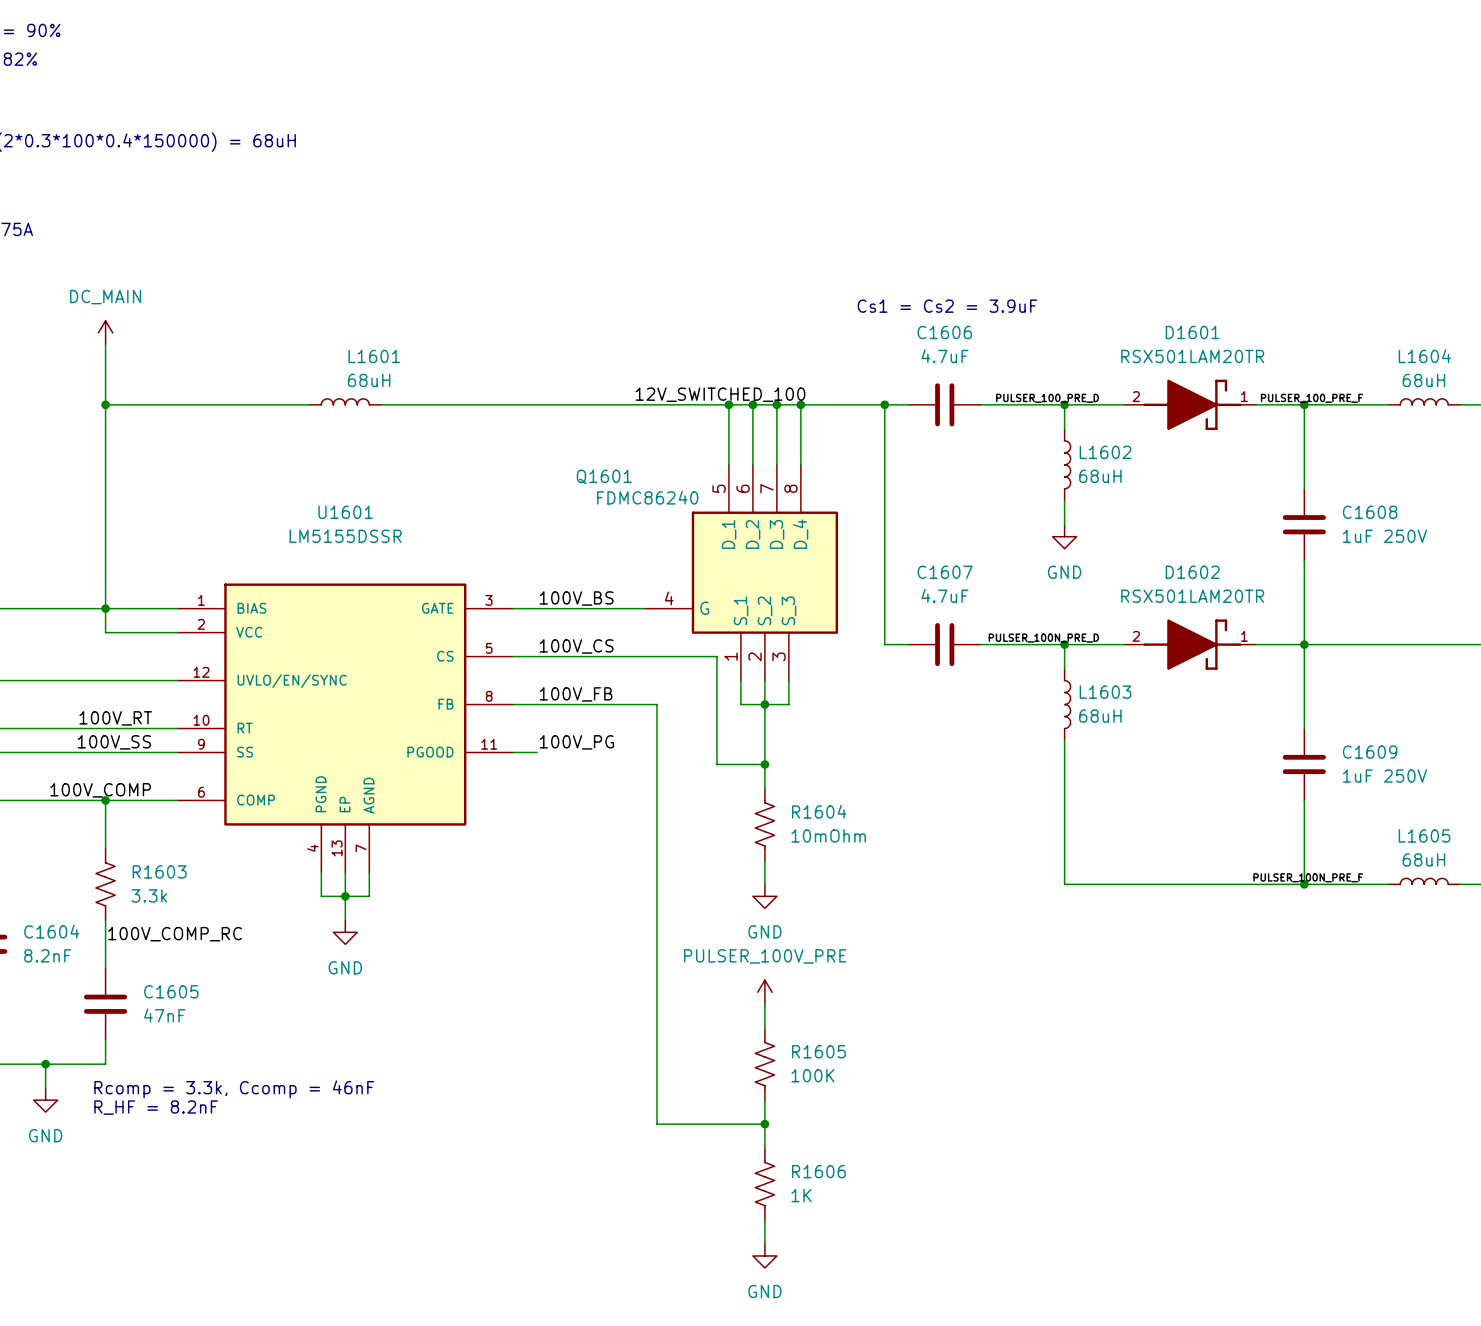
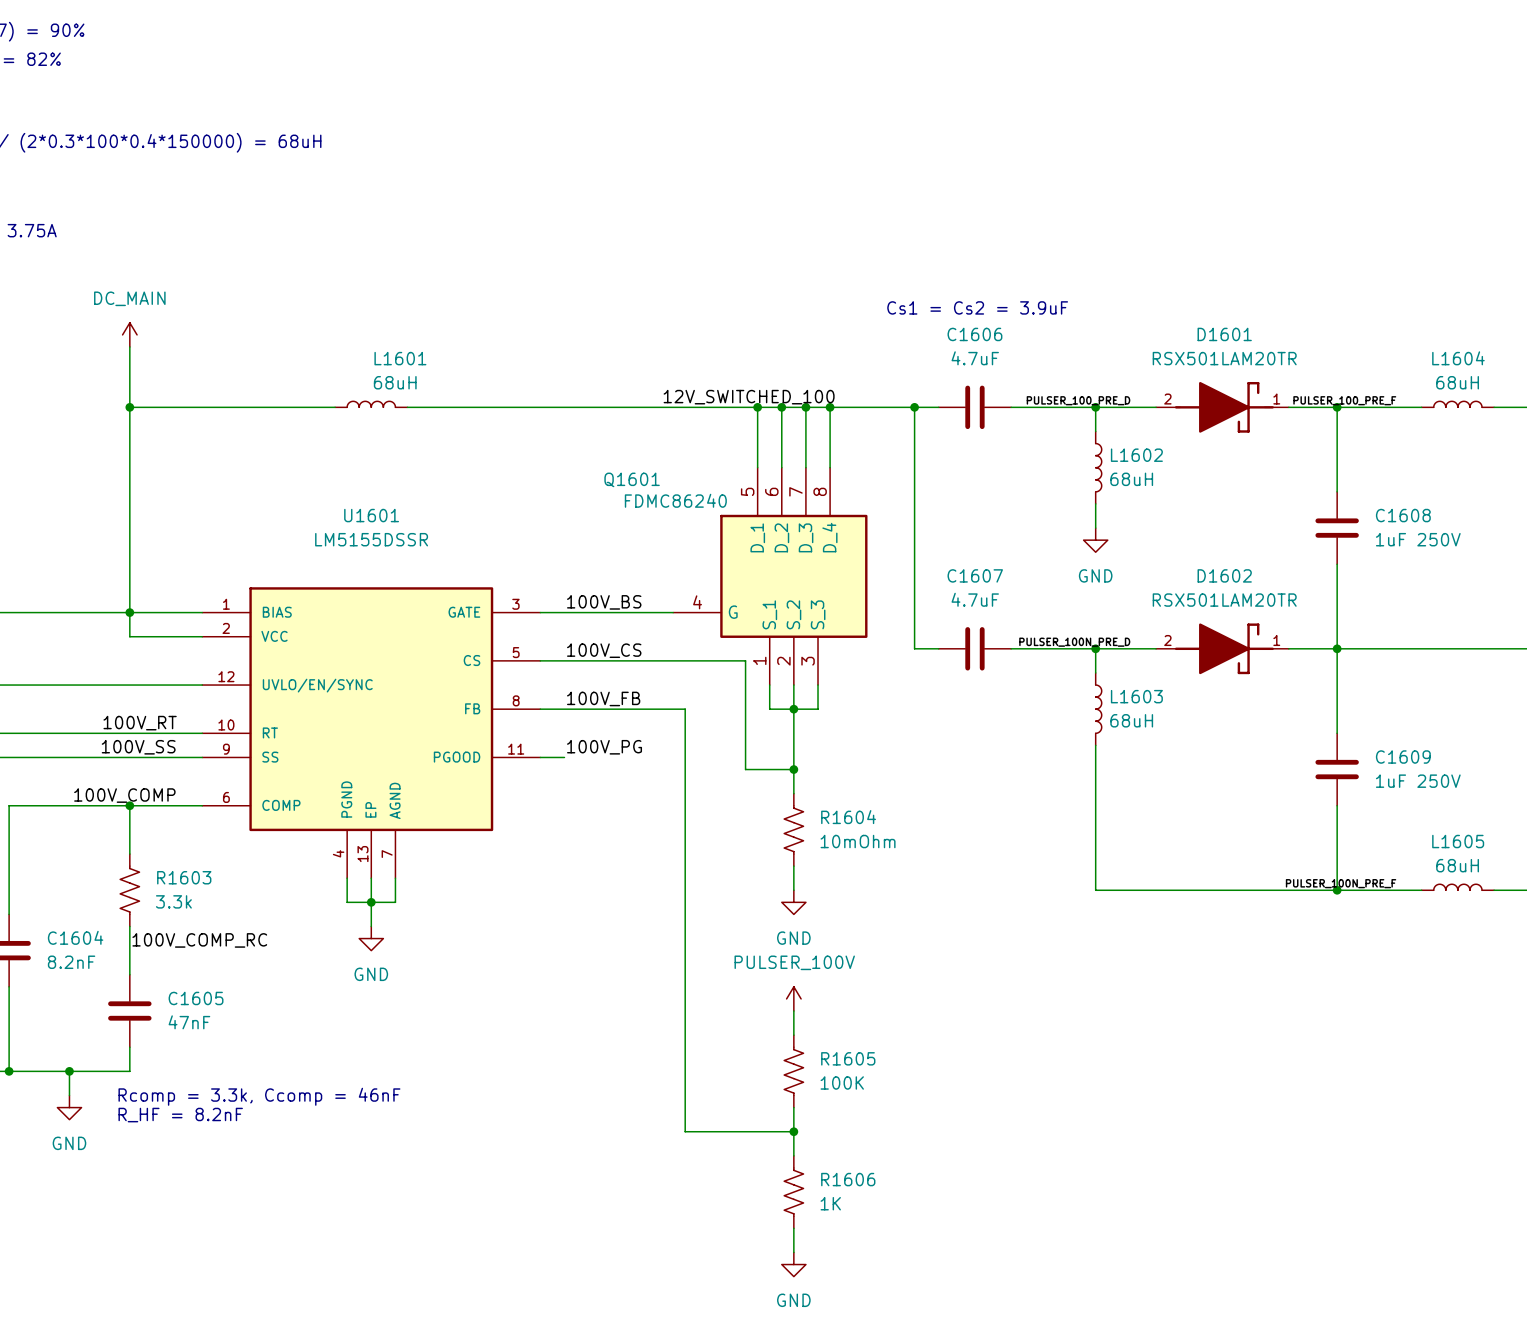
power symbol: PULSER_100V_PRE (764, 992) -> PULSER_100V (793, 998)

